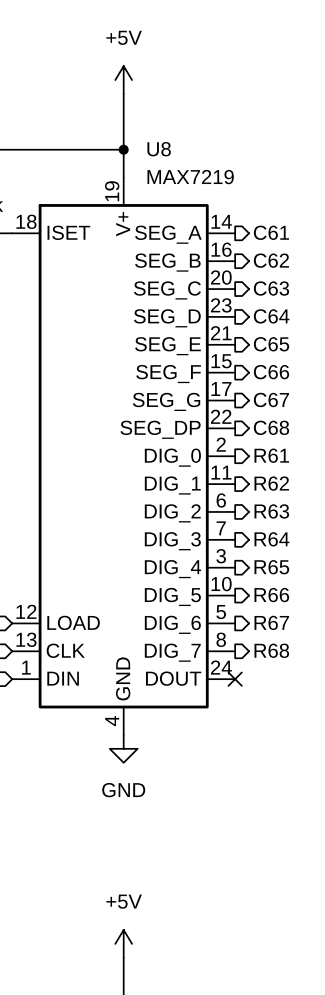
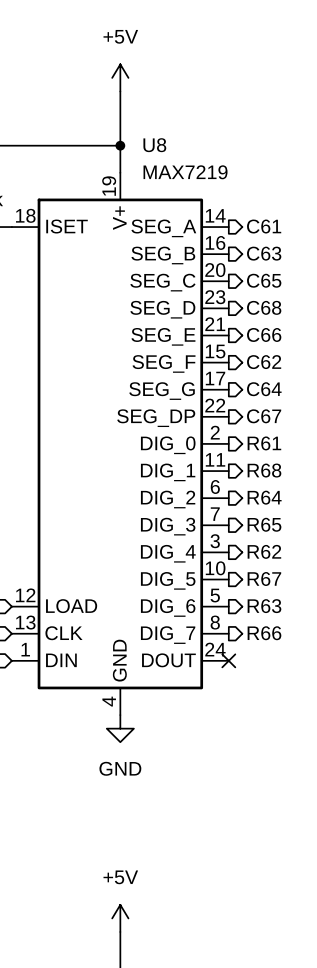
hierarchical label: C62 (271, 260) -> C63 (264, 253)
hierarchical label: C63 (271, 288) -> C65 (264, 280)
hierarchical label: C64 (271, 316) -> C68 (264, 307)
hierarchical label: C65 (271, 344) -> C66 (264, 334)
hierarchical label: C66 (271, 372) -> C62 (264, 362)
hierarchical label: C67 (271, 399) -> C64 (264, 389)
hierarchical label: C68 (271, 427) -> C67 (264, 416)
hierarchical label: R62 (271, 483) -> R68 (264, 470)
hierarchical label: R63 (271, 511) -> R64 (264, 497)
hierarchical label: R64 (271, 539) -> R65 (264, 524)
hierarchical label: R65 (271, 567) -> R62 (264, 551)
hierarchical label: R66 (271, 595) -> R67 (264, 579)
hierarchical label: R67 (271, 622) -> R63 (264, 606)
hierarchical label: R68 (271, 650) -> R66 (264, 633)

